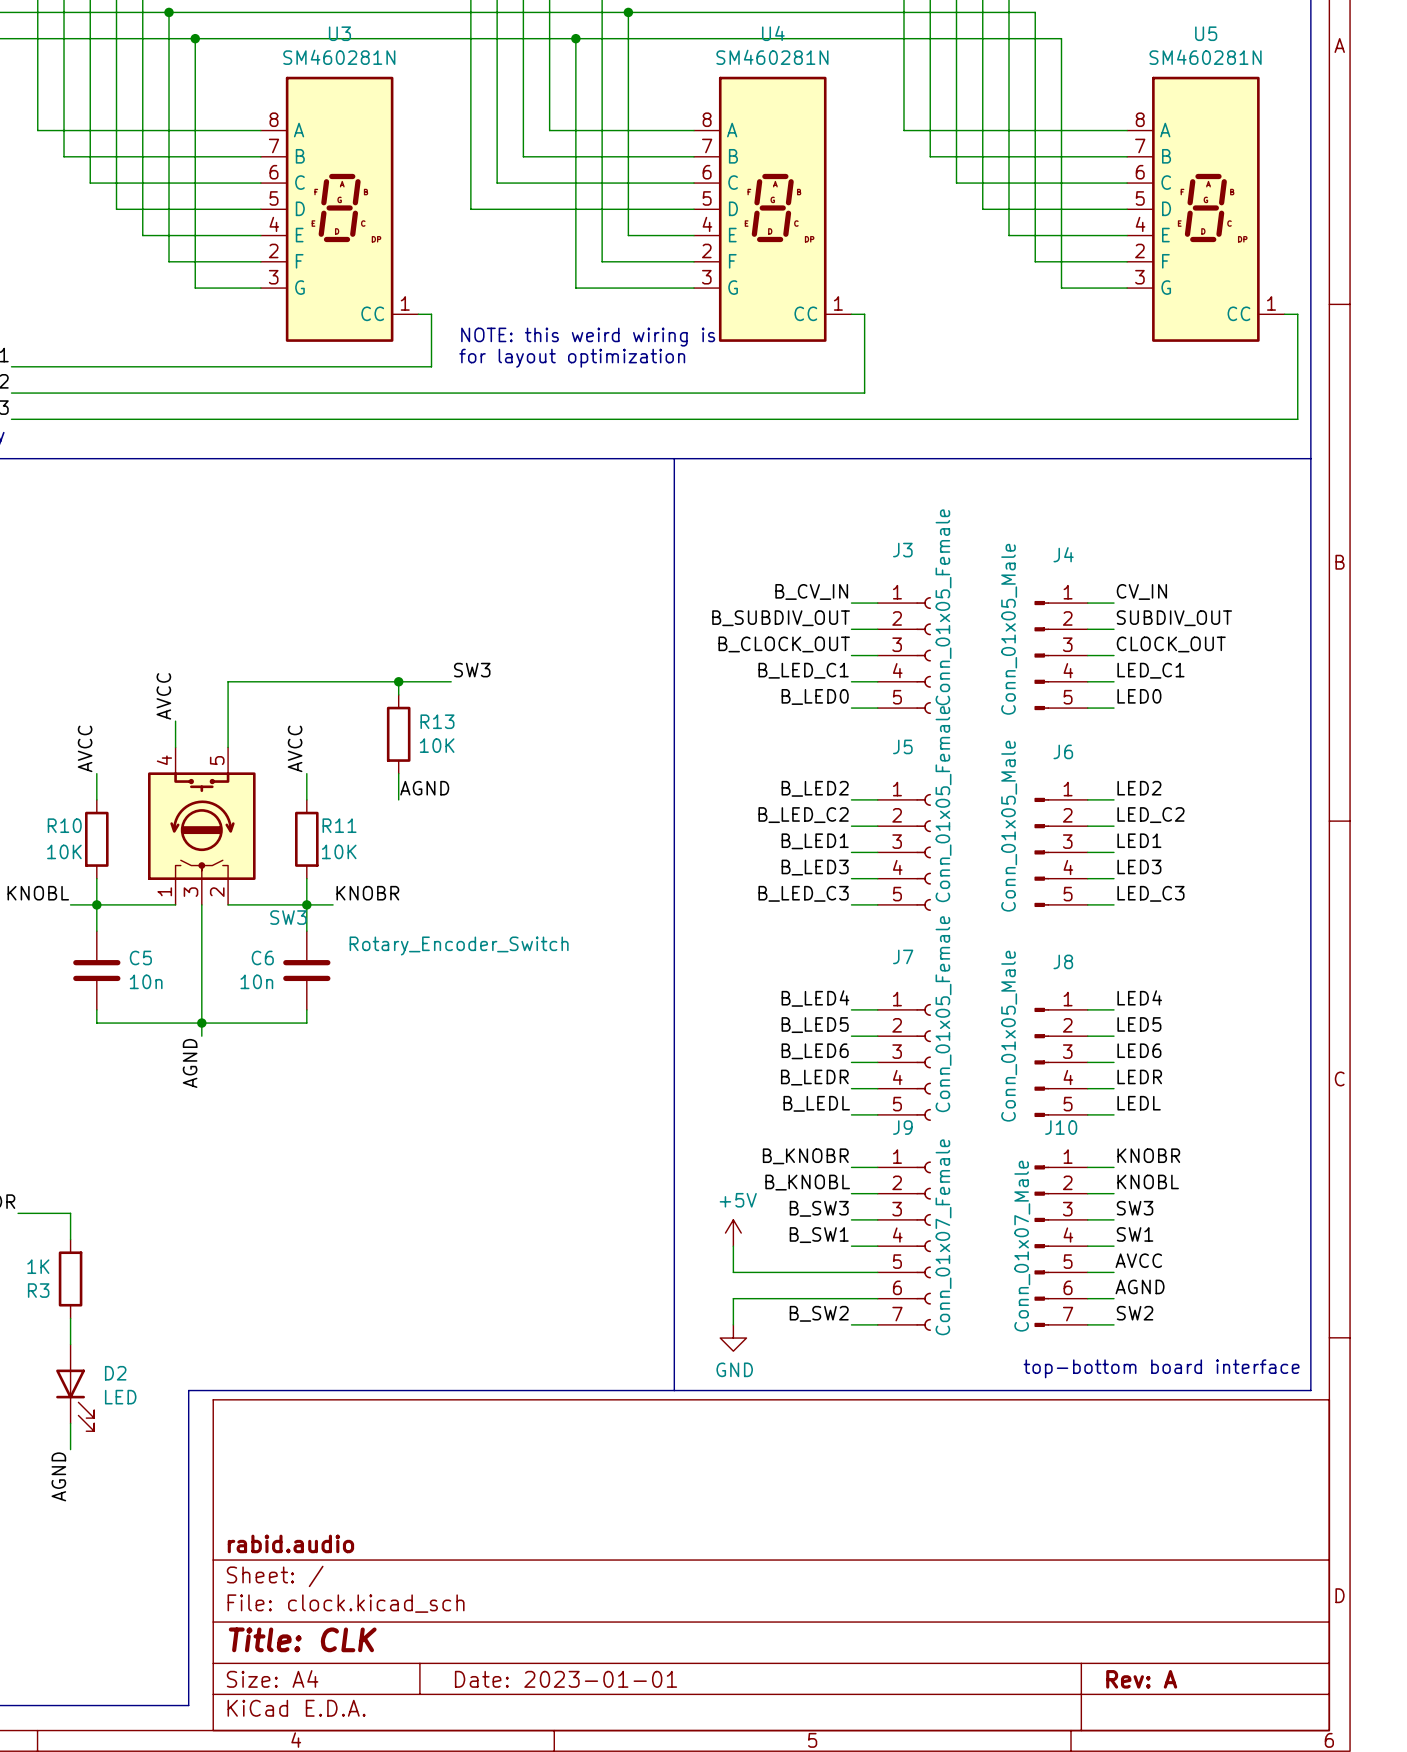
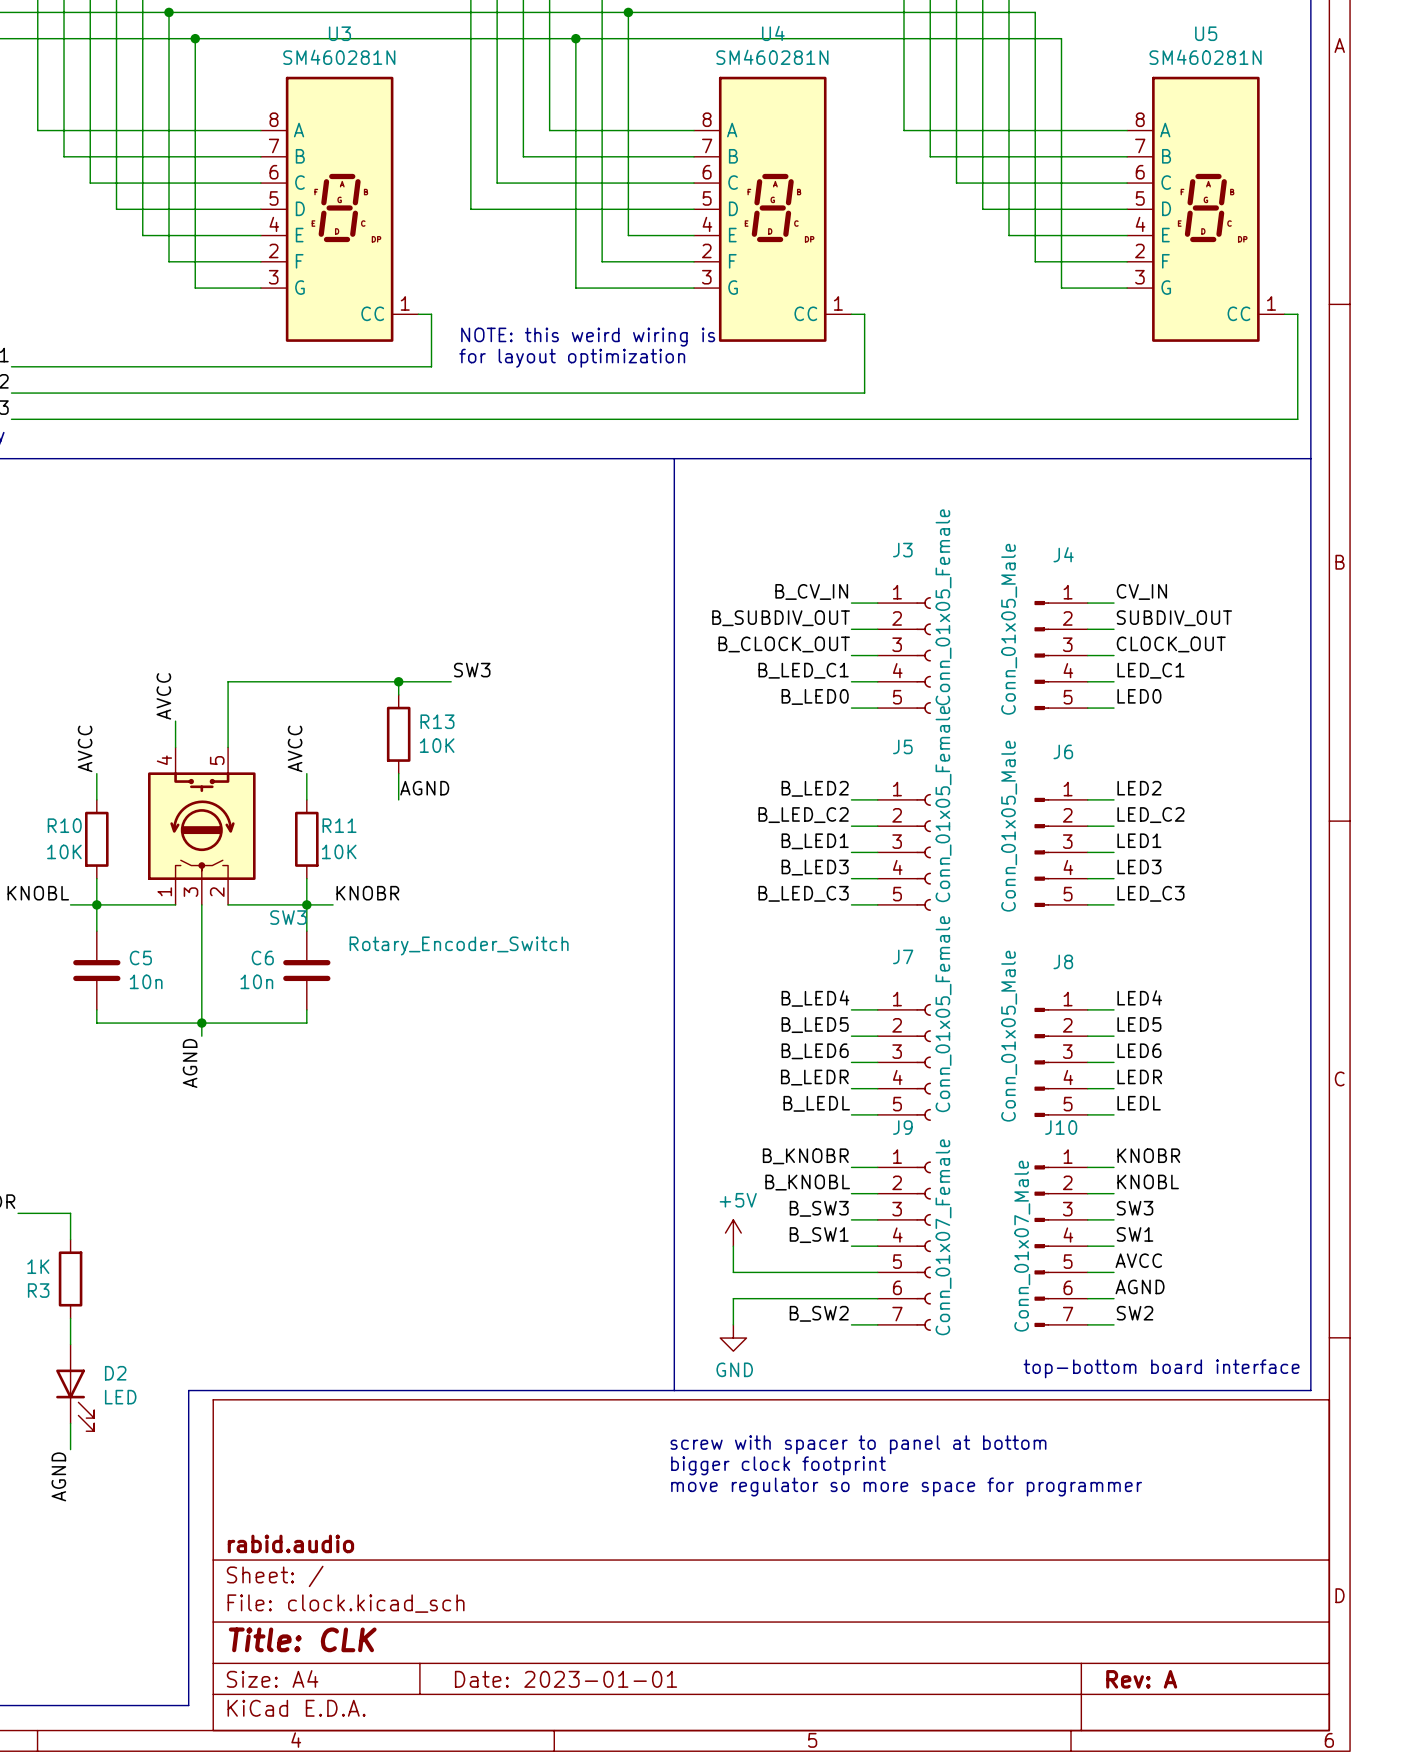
text: none -> screw with spacer to panel at bottom (858, 1444)
text: none -> bigger clock footprint (778, 1465)
text: none -> move regulator so more space for programmer (906, 1486)

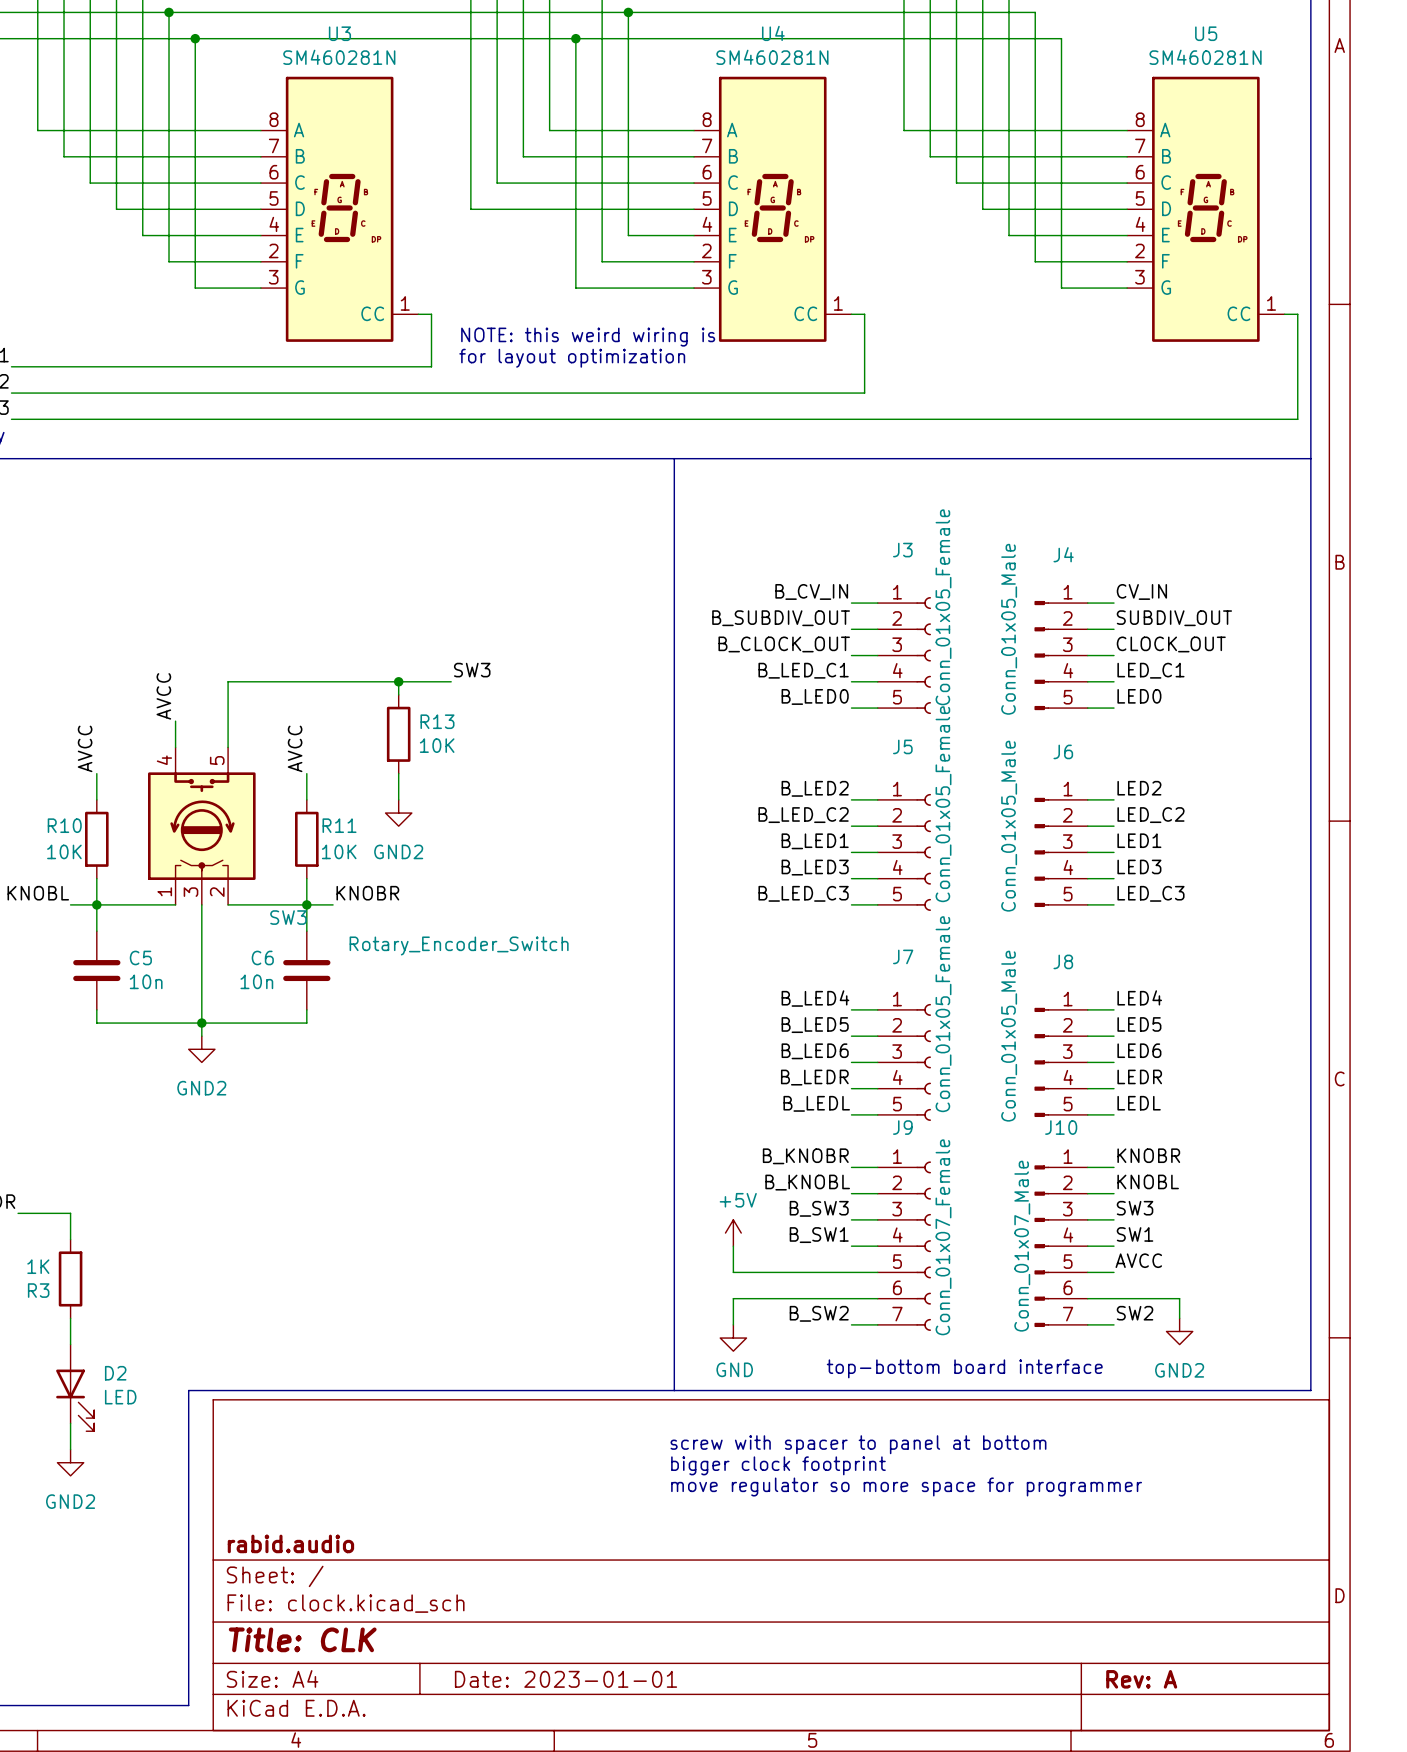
label: AGND (424, 788) -> none
power symbol: none -> GND2 (398, 813)
power symbol: none -> GND2 (201, 1049)
label: AGND (190, 1063) -> none
label: AGND (1140, 1286) -> none
wire: none -> (1113, 1298) (1179, 1298) (1179, 1318)
power symbol: none -> GND2 (1179, 1331)
text position: top-bottom board interface (1161, 1368) -> top-bottom board interface (964, 1368)
power symbol: none -> GND2 (70, 1462)
label: AGND (58, 1476) -> none

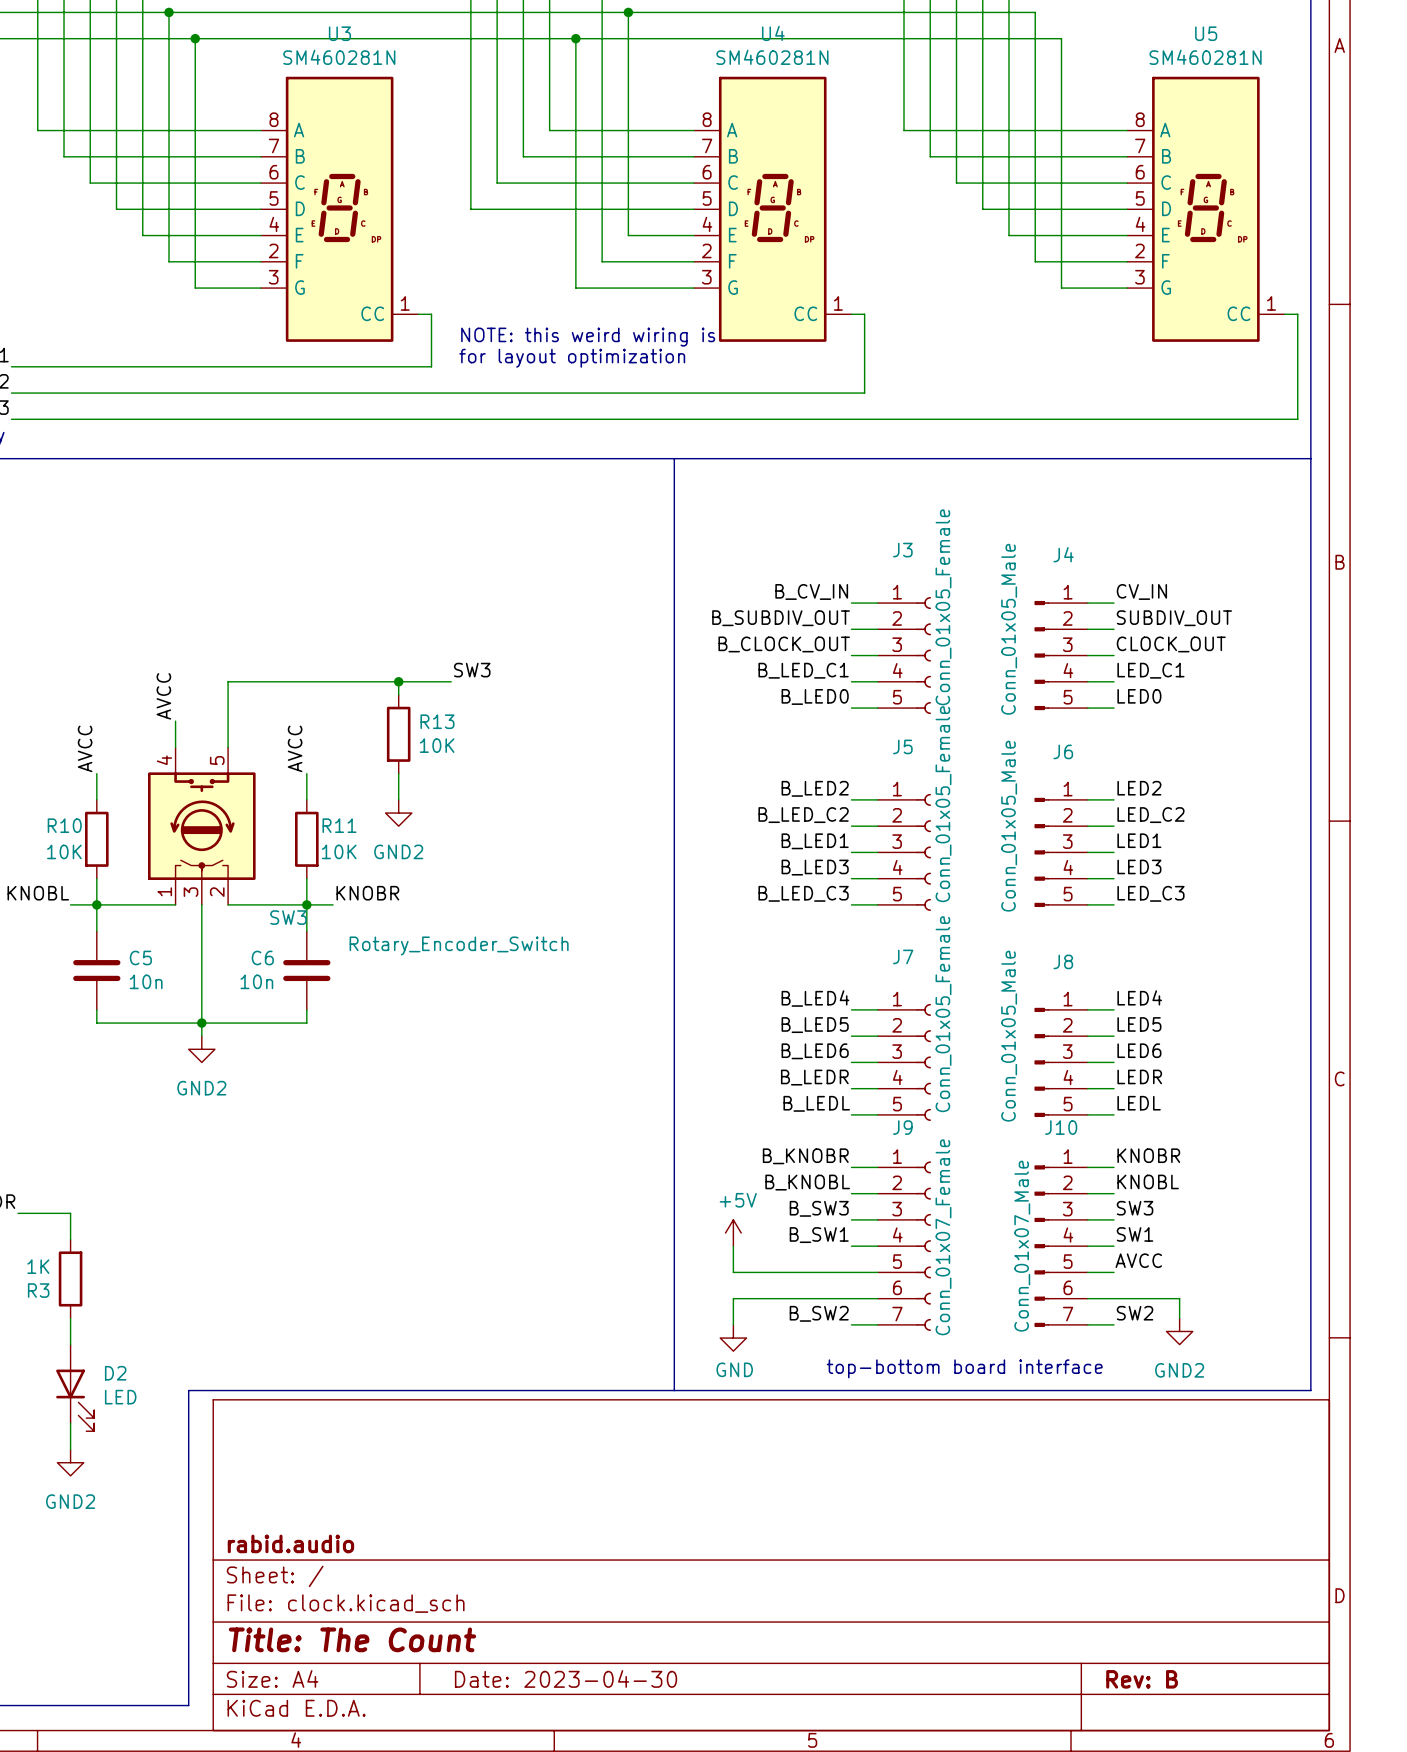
text: screw with spacer to panel at bottom (858, 1444) -> none
text: bigger clock footprint (778, 1465) -> none
text: move regulator so more space for programmer (906, 1486) -> none
title block: Title: CLK (302, 1639) -> Title: The Count (352, 1639)
title block: Date: 2023-01-01 (566, 1679) -> Date: 2023-04-30 (566, 1678)
title block: Rev: A (1141, 1679) -> Rev: B (1142, 1679)

